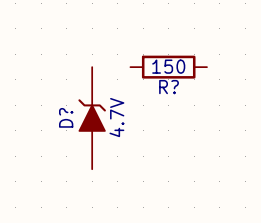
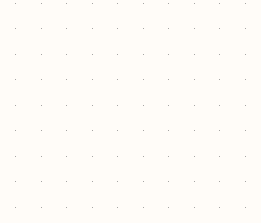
R?: 150 (168, 67) -> none
D?: 4.7V (92, 118) -> none

